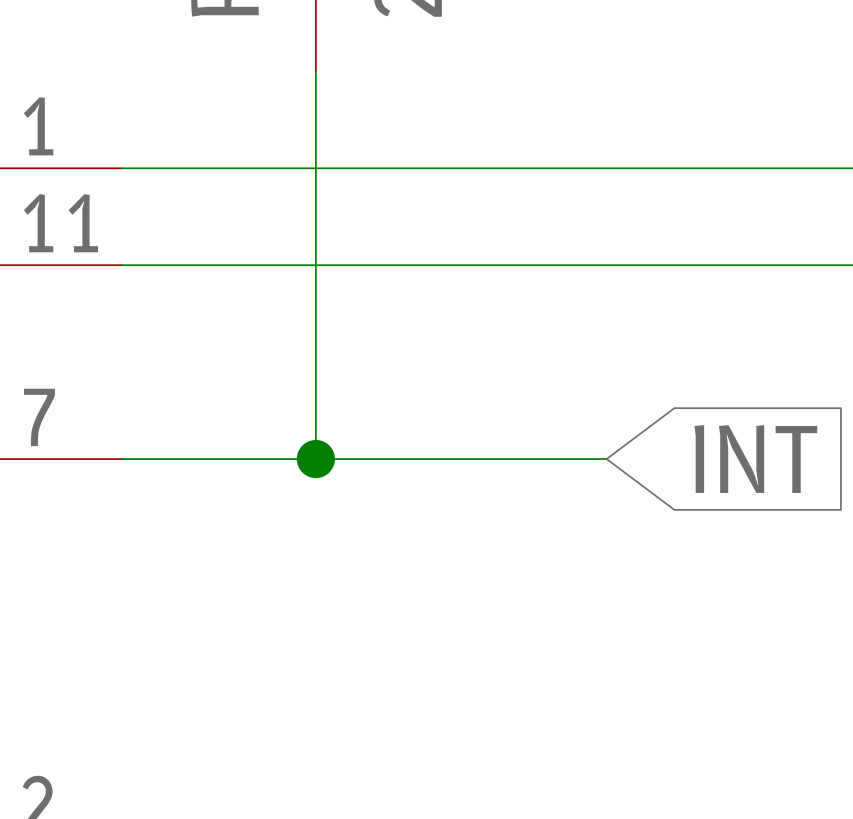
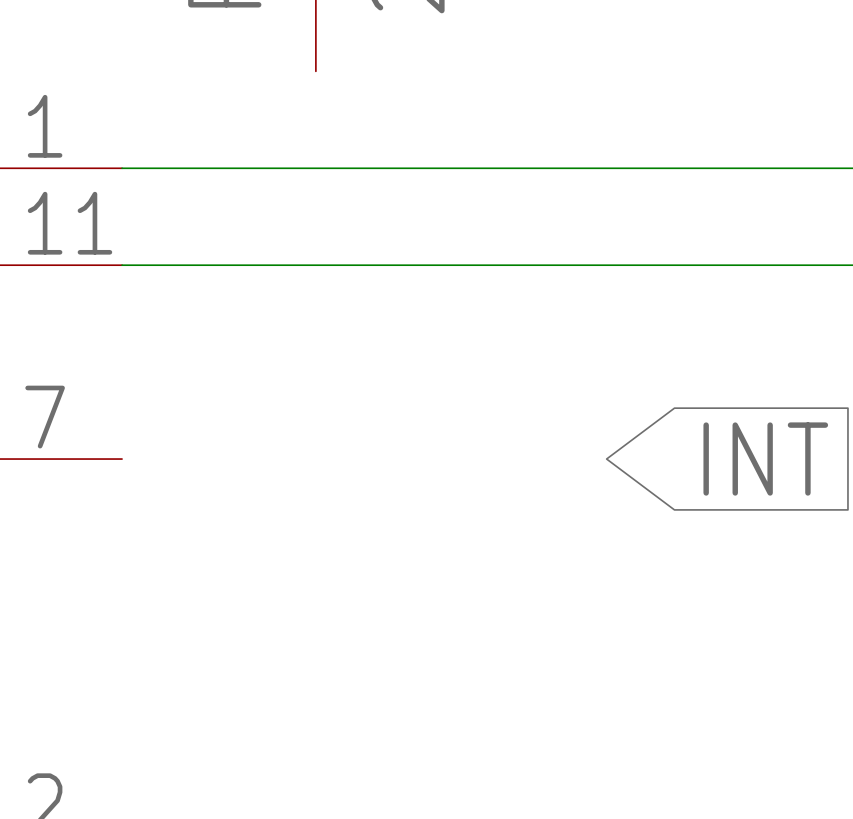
wire: (315, 71) (315, 459) -> none
wire: (122, 459) (606, 459) -> none
junction: (315, 459) -> none

